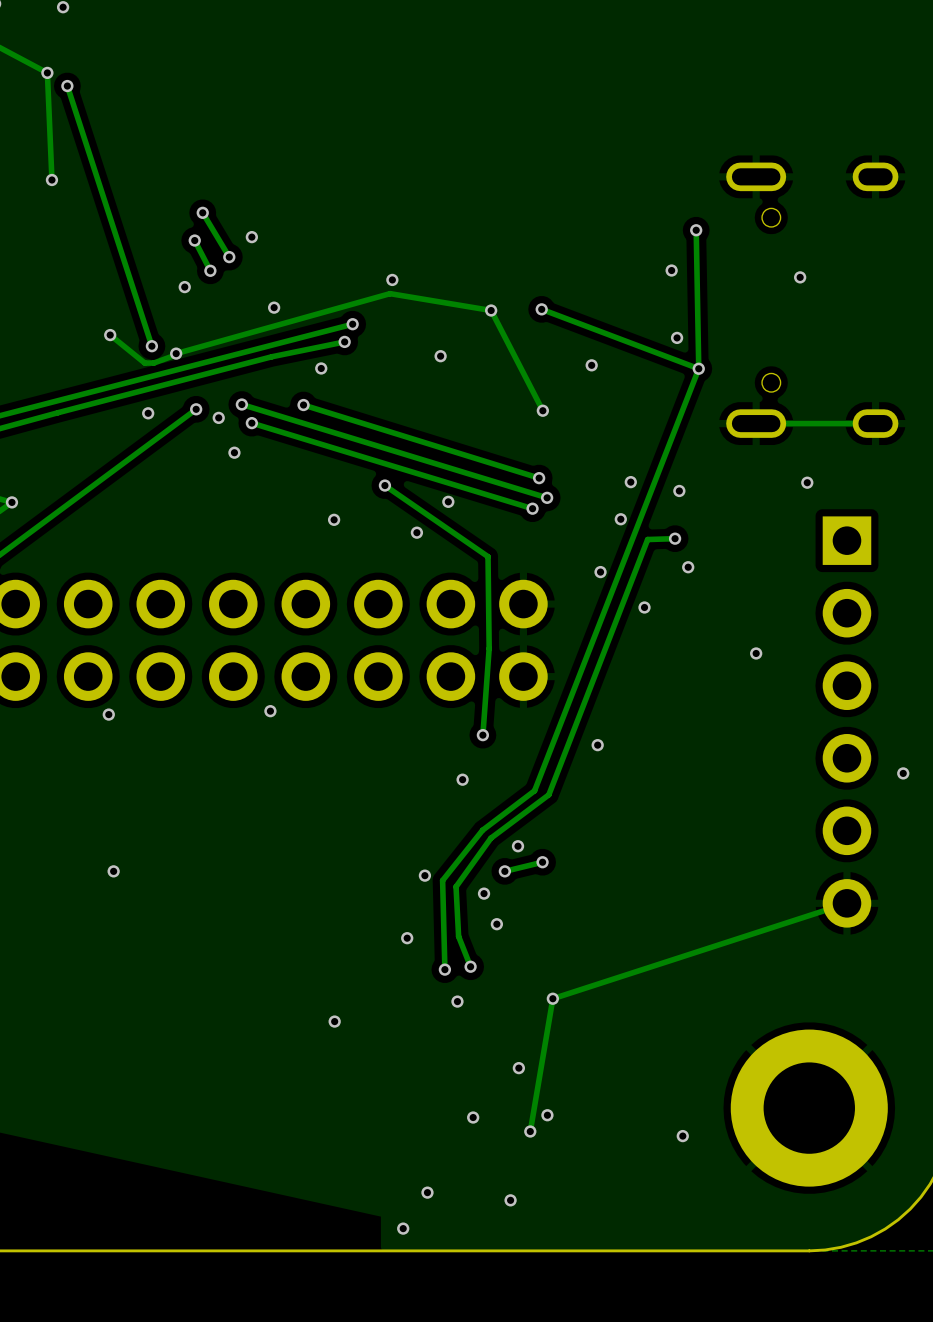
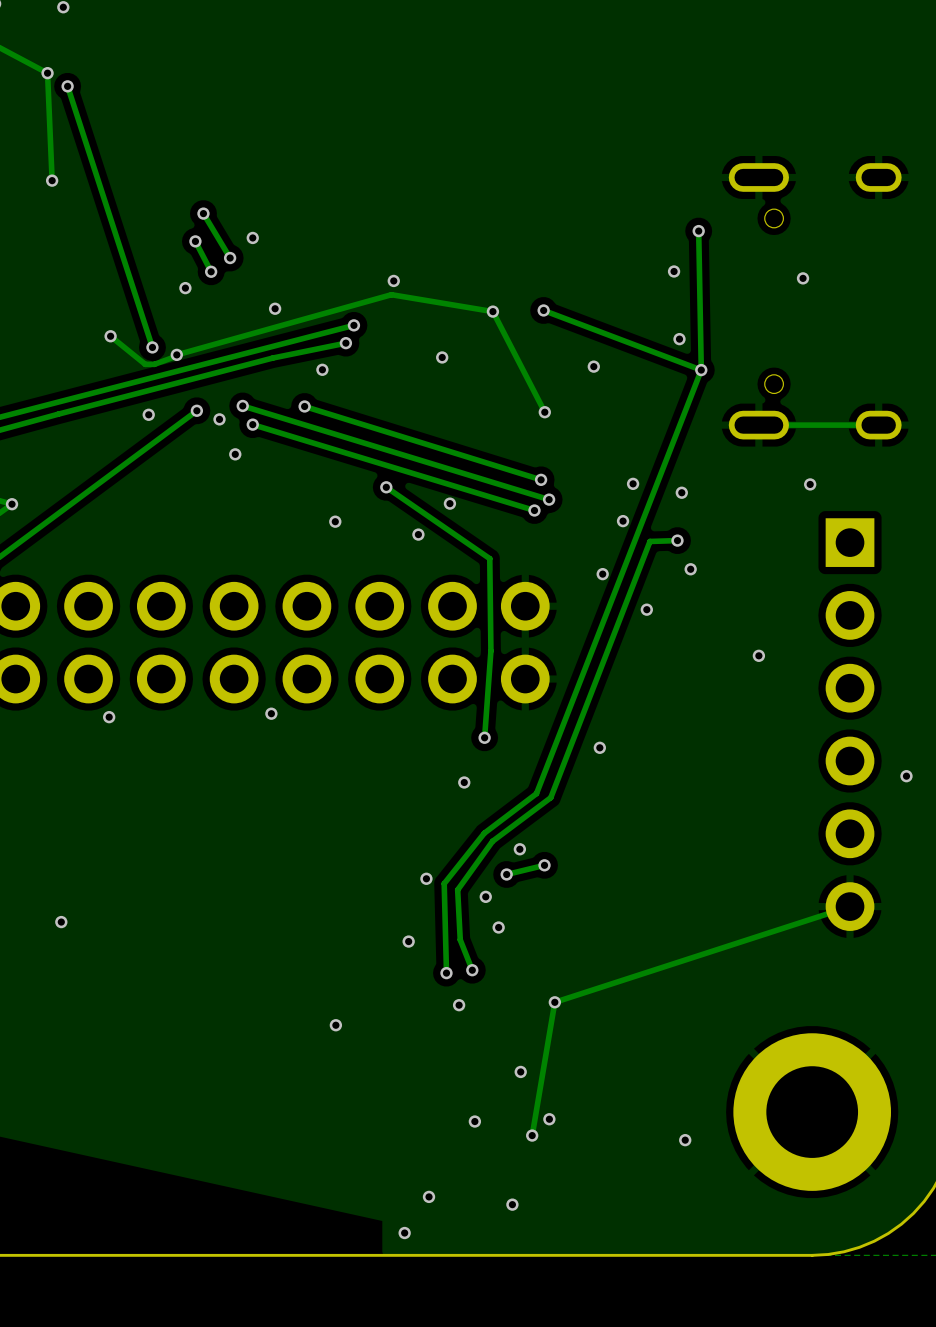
via: (113, 871) -> none
via: none -> (61, 922)

